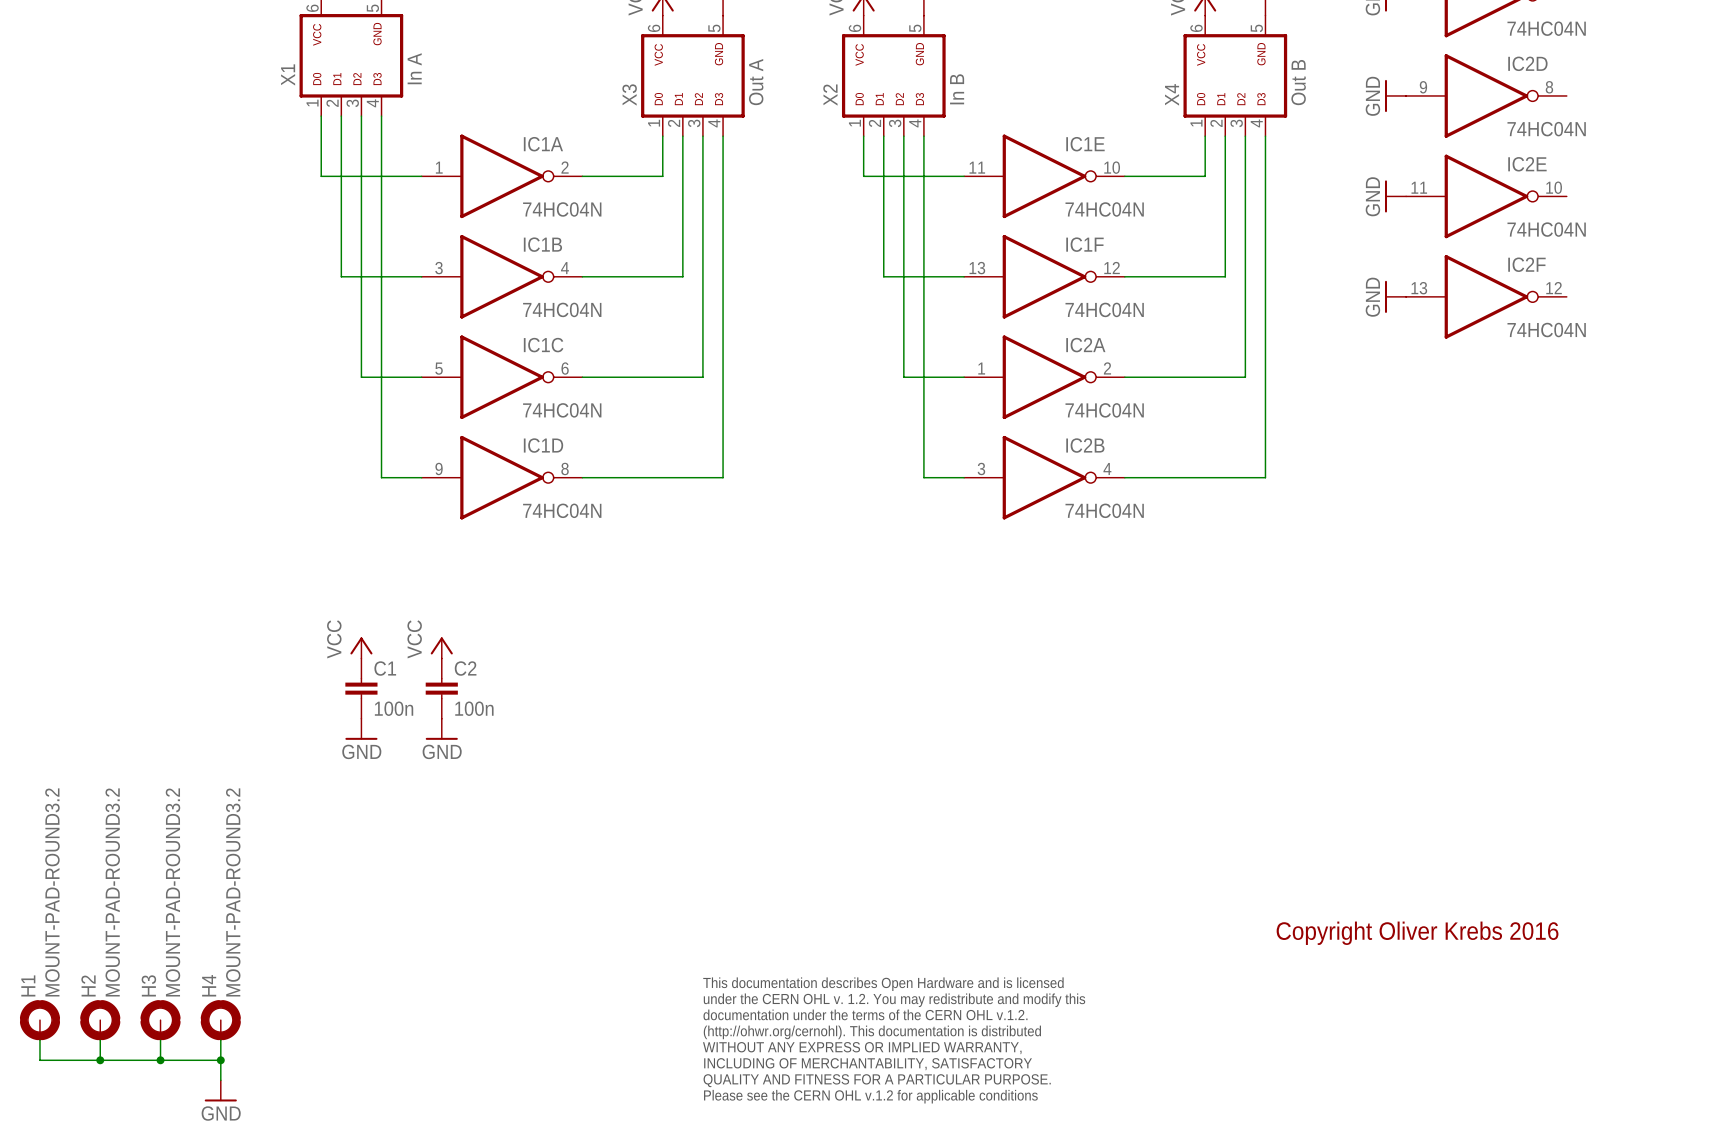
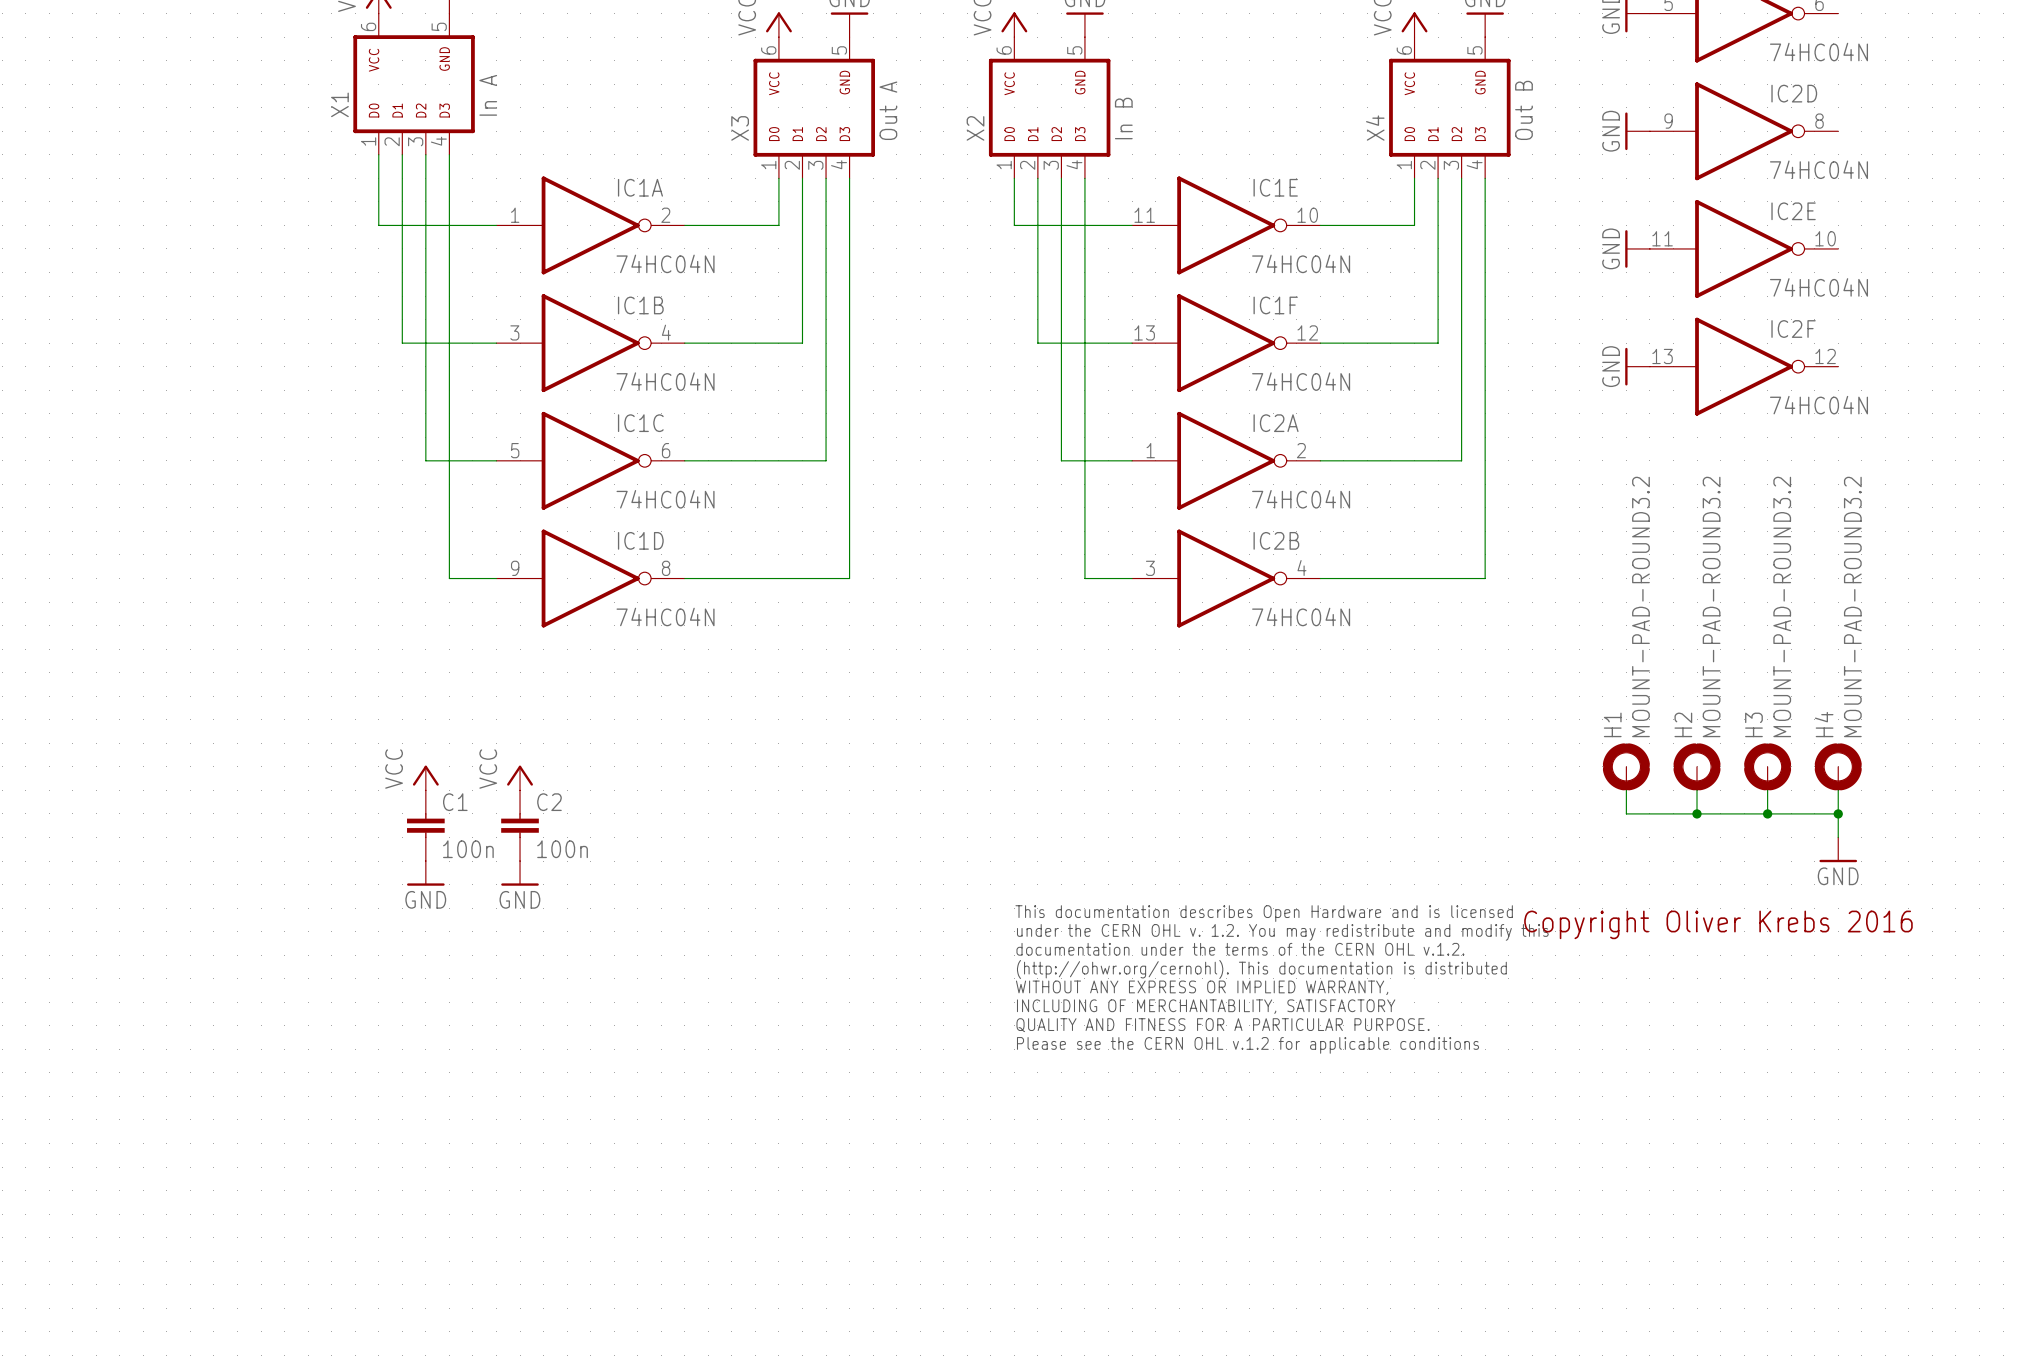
wire: none -> (1626, 790) (1626, 813) (1838, 813)
wire: none -> (1697, 790) (1697, 813)
wire: none -> (1767, 790) (1767, 813)
wire: none -> (1838, 790) (1838, 837)
junction: none -> (1697, 813)
junction: none -> (1767, 813)
junction: none -> (1838, 813)
power symbol: none -> GND (1838, 849)
text: none -> This documentation describes Open Hardware and is licensed (1264, 913)
text: none -> under the CERN OHL v. 1.2. You may redistribute and modify this (1282, 932)
text: none -> documentation under the terms of the CERN OHL v.1.2. (1240, 949)
text: none -> (http://ohwr.org/cernohl). This documentation is distributed (1261, 969)
text: none -> WITHOUT ANY EXPRESS OR IMPLIED WARRANTY, (1202, 987)
text: none -> INCLUDING OF MERCHANTABILITY, SATISFACTORY (1206, 1006)
text: none -> QUALITY AND FITNESS FOR A PARTICULAR PURPOSE. (1223, 1025)
text: none -> Please see the CERN OHL v.1.2 for applicable conditions (1248, 1045)
text position: Copyright Oliver Krebs 2016 (1417, 933) -> Copyright Oliver Krebs 2016 (1718, 924)
text: This documentation describes Open Hardware and is licensed (883, 984) -> none
text: under the CERN OHL v. 1.2. You may redistribute and modify this (894, 1000) -> none
text: documentation under the terms of the CERN OHL v.1.2. (865, 1014) -> none
H1 position: (39, 1020) -> (1626, 766)
H2 position: (100, 1020) -> (1697, 766)
H3 position: (160, 1020) -> (1767, 766)
H4 position: (220, 1020) -> (1838, 766)
text: (http://ohwr.org/cernohl). This documentation is distributed (872, 1032) -> none
wire: (39, 1040) (39, 1060) (220, 1060) -> none
wire: (100, 1040) (100, 1060) -> none
wire: (160, 1040) (160, 1060) -> none
wire: (220, 1040) (220, 1080) -> none
text: WITHOUT ANY EXPRESS OR IMPLIED WARRANTY, (862, 1048) -> none
junction: (100, 1060) -> none
junction: (160, 1060) -> none
junction: (220, 1060) -> none
text: INCLUDING OF MERCHANTABILITY, SATISFACTORY (868, 1064) -> none
text: QUALITY AND FITNESS FOR A PARTICULAR PURPOSE. (877, 1080) -> none
power symbol: GND (220, 1090) -> none
text: Please see the CERN OHL v.1.2 for applicable conditions (870, 1096) -> none

